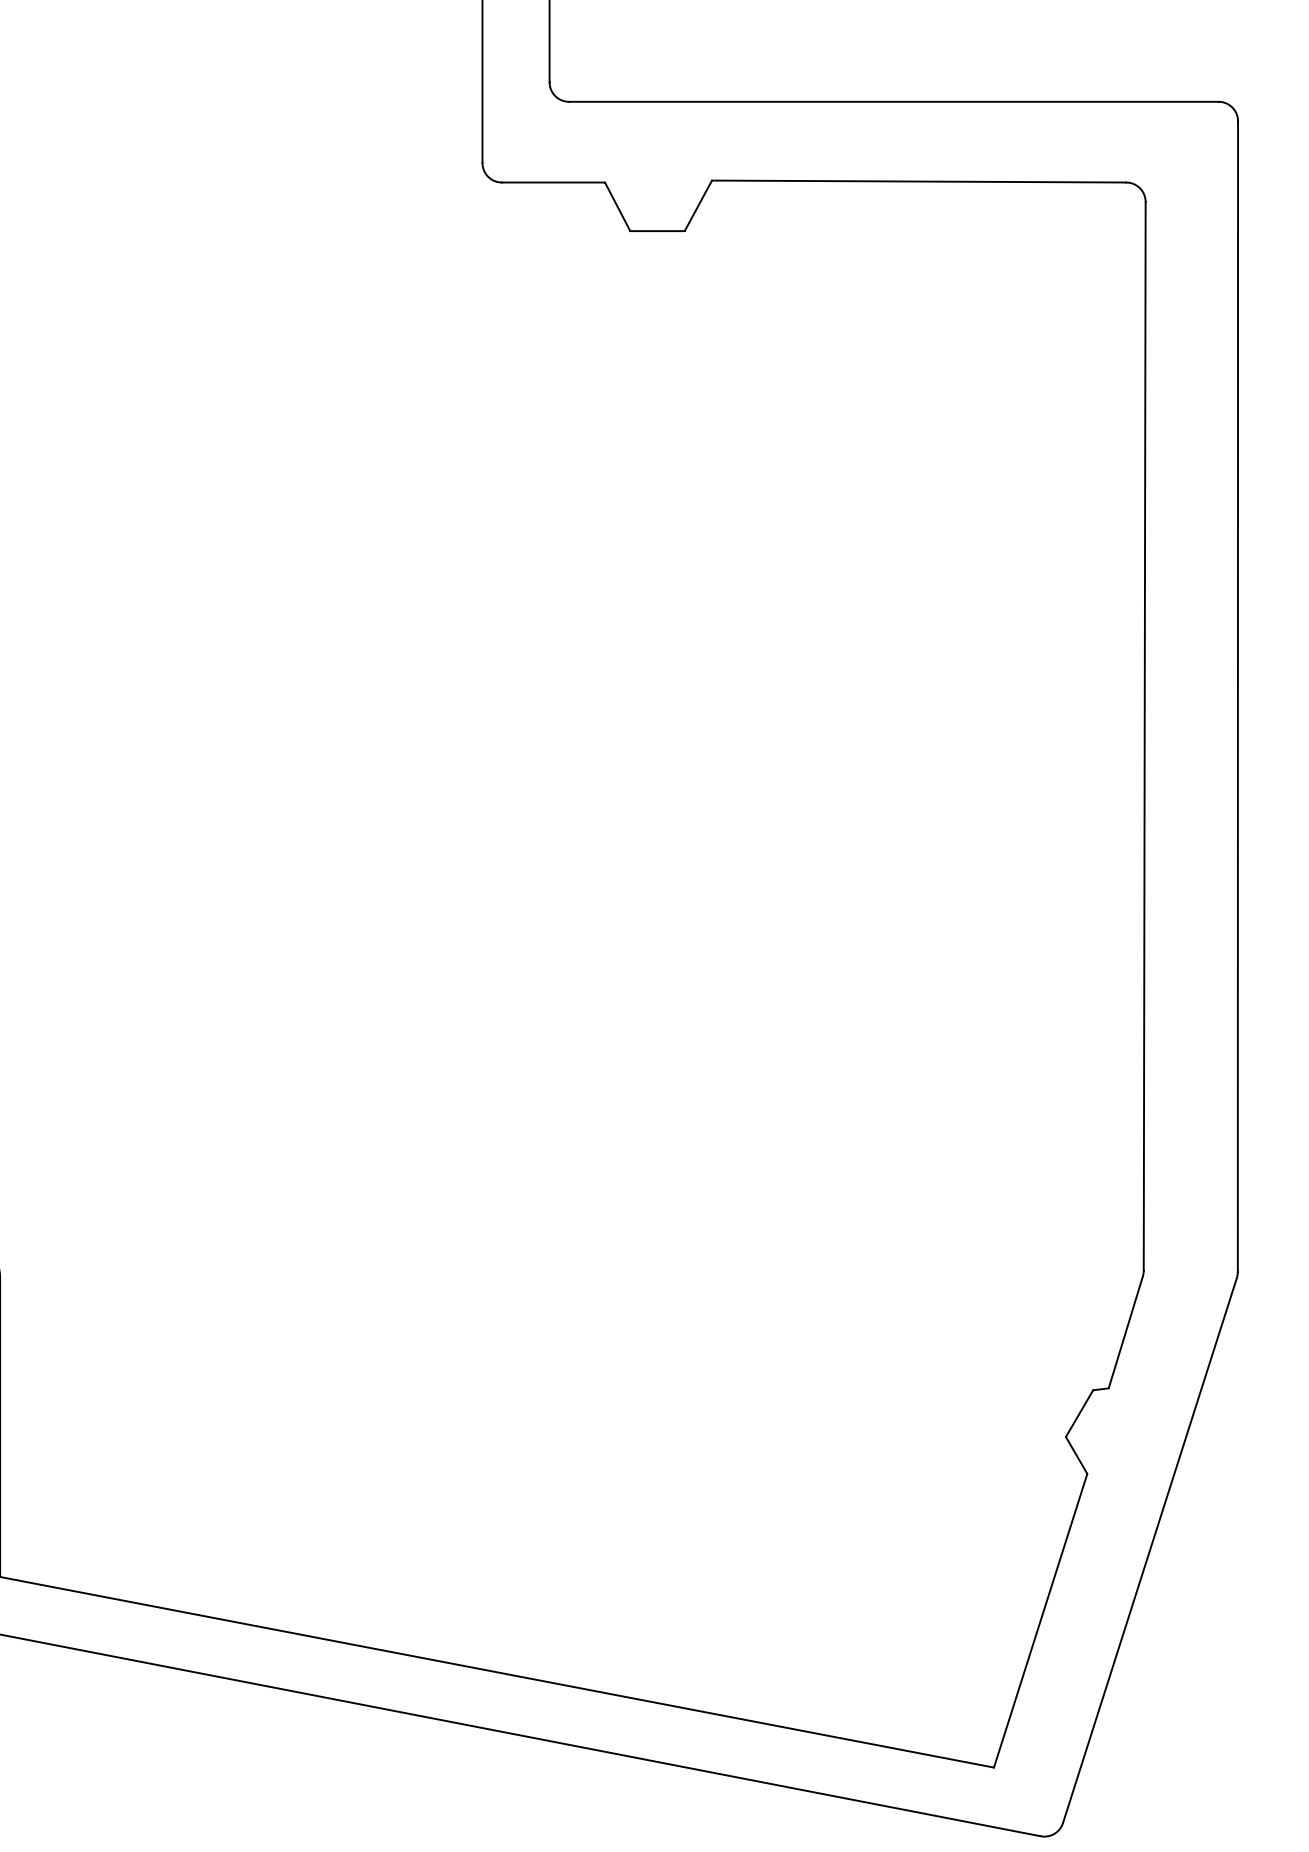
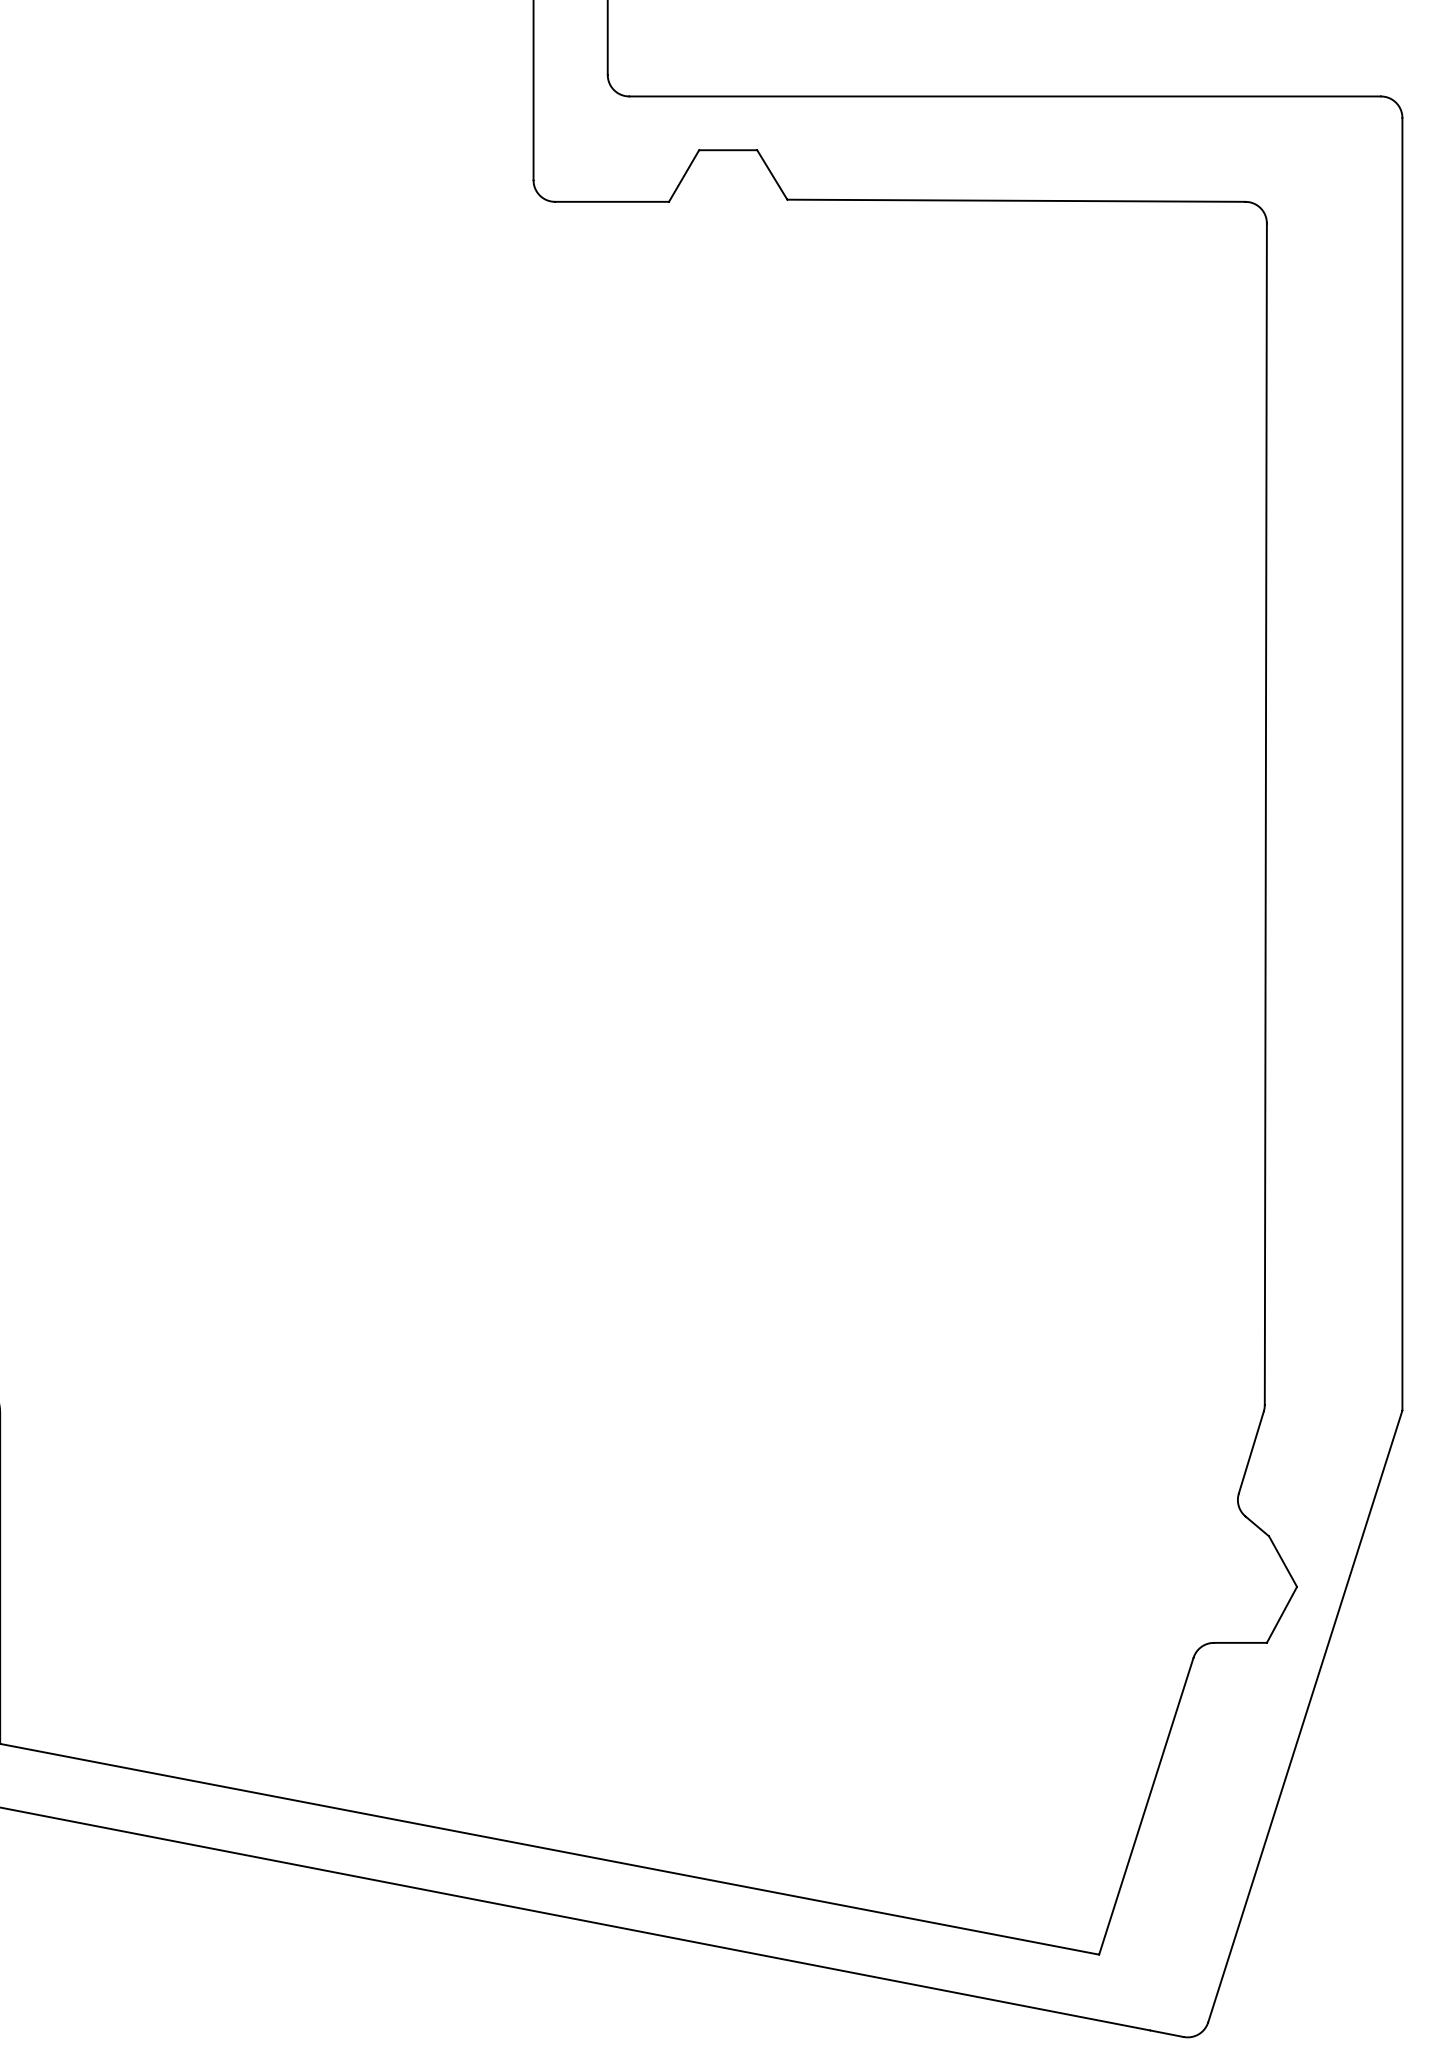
board edge: (549, 67) (551, 90) (556, 97) (566, 101) (1218, 101) (1230, 106) (1237, 116) (1237, 1273) (1063, 1822) (1054, 1833) (1040, 1836) -> (607, 74) (609, 84) (614, 90) (619, 94) (629, 96) (1380, 96) (1394, 101) (1401, 113) (1402, 1410) (1207, 2024) (1200, 2032) (1188, 2037) (1150, 2030)
board edge: (711, 180) (684, 231) (630, 231) (605, 182) -> (787, 199) (757, 150) (699, 150) (669, 201)
board edge: (1142, 1276) (1108, 1388) (1093, 1390) (1065, 1436) (1087, 1473) (1079, 1499) -> (1263, 1411) (1238, 1493) (1238, 1503) (1243, 1514) (1269, 1536) (1297, 1586) (1266, 1642)
board edge: none -> (1267, 1642) (1208, 1643) (1199, 1648) (1193, 1657)

